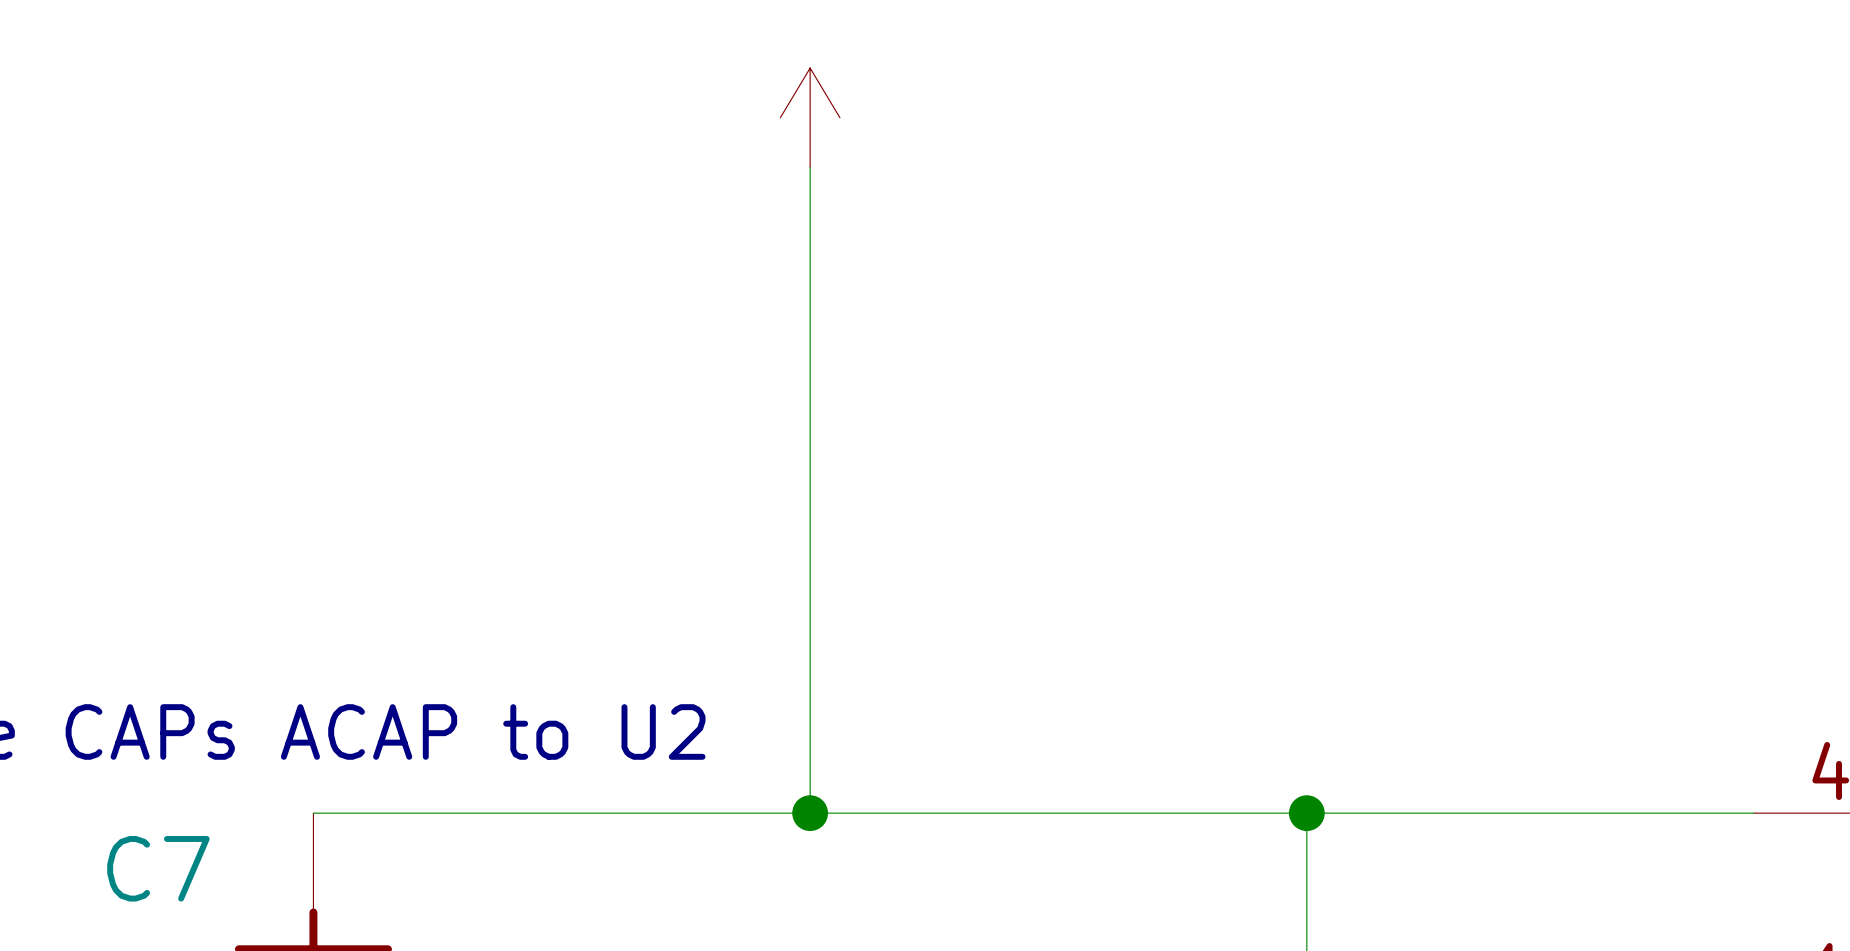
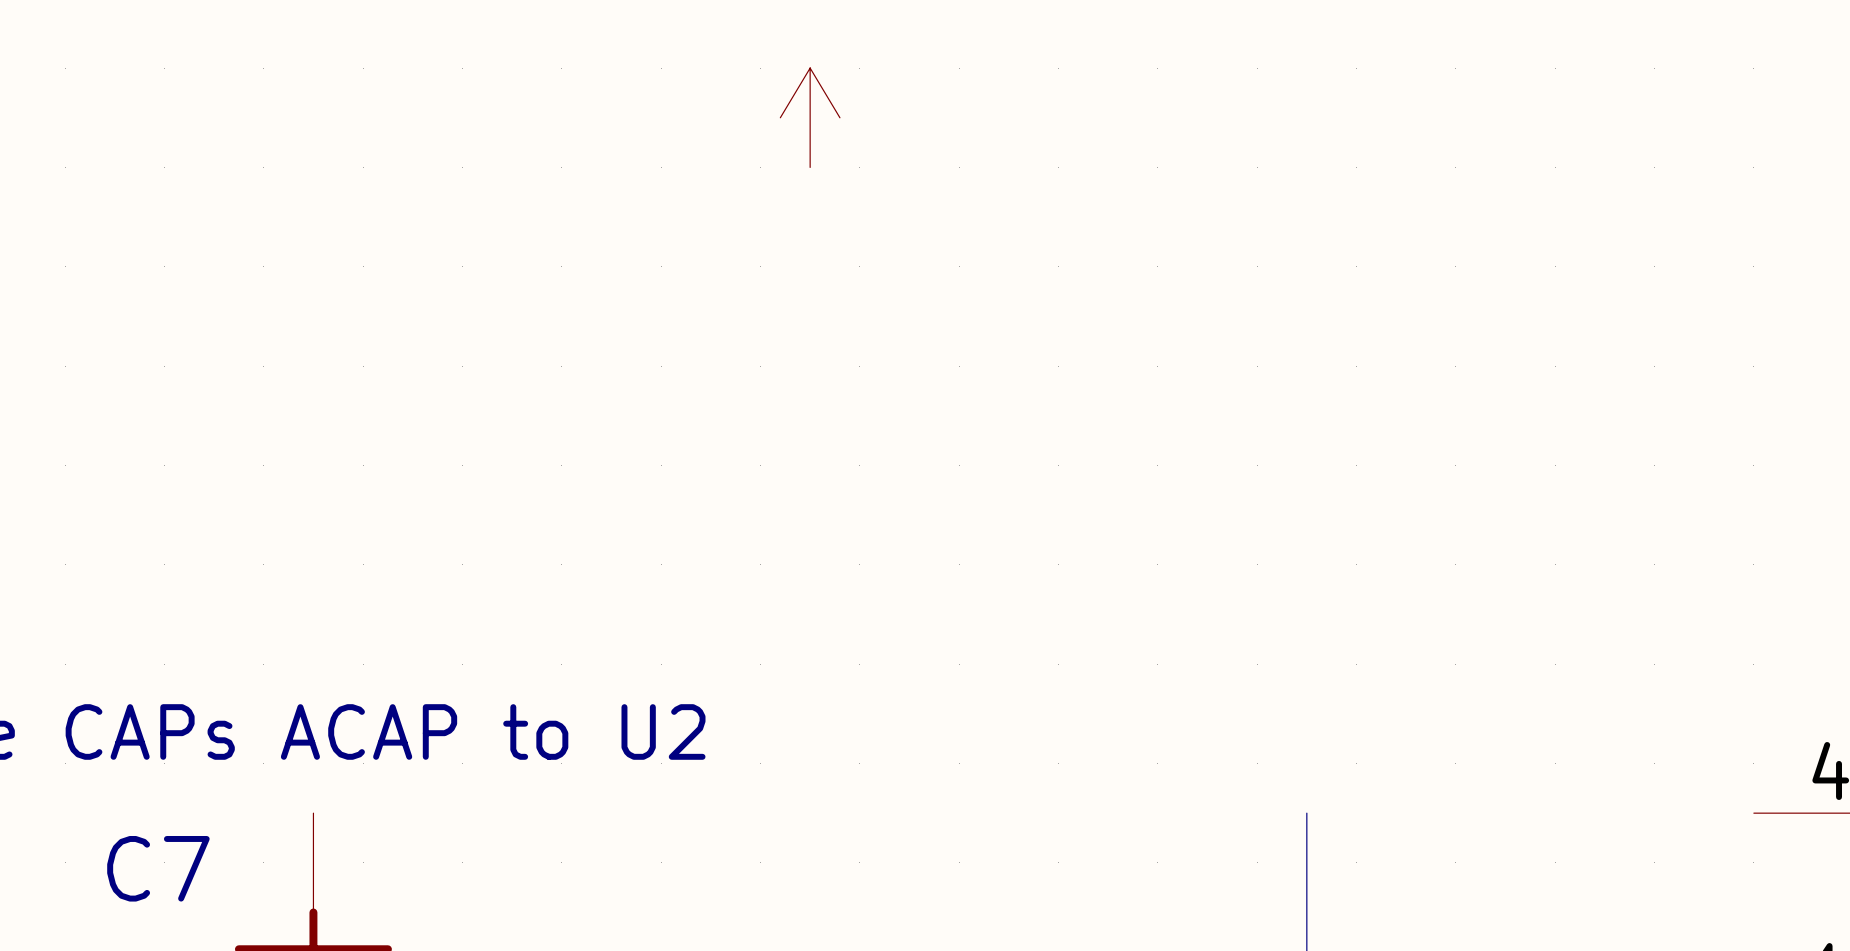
wire: (810, 167) (810, 813) -> none
wire: (313, 813) (1753, 813) -> none
junction: (810, 813) -> none
junction: (1306, 813) -> none

